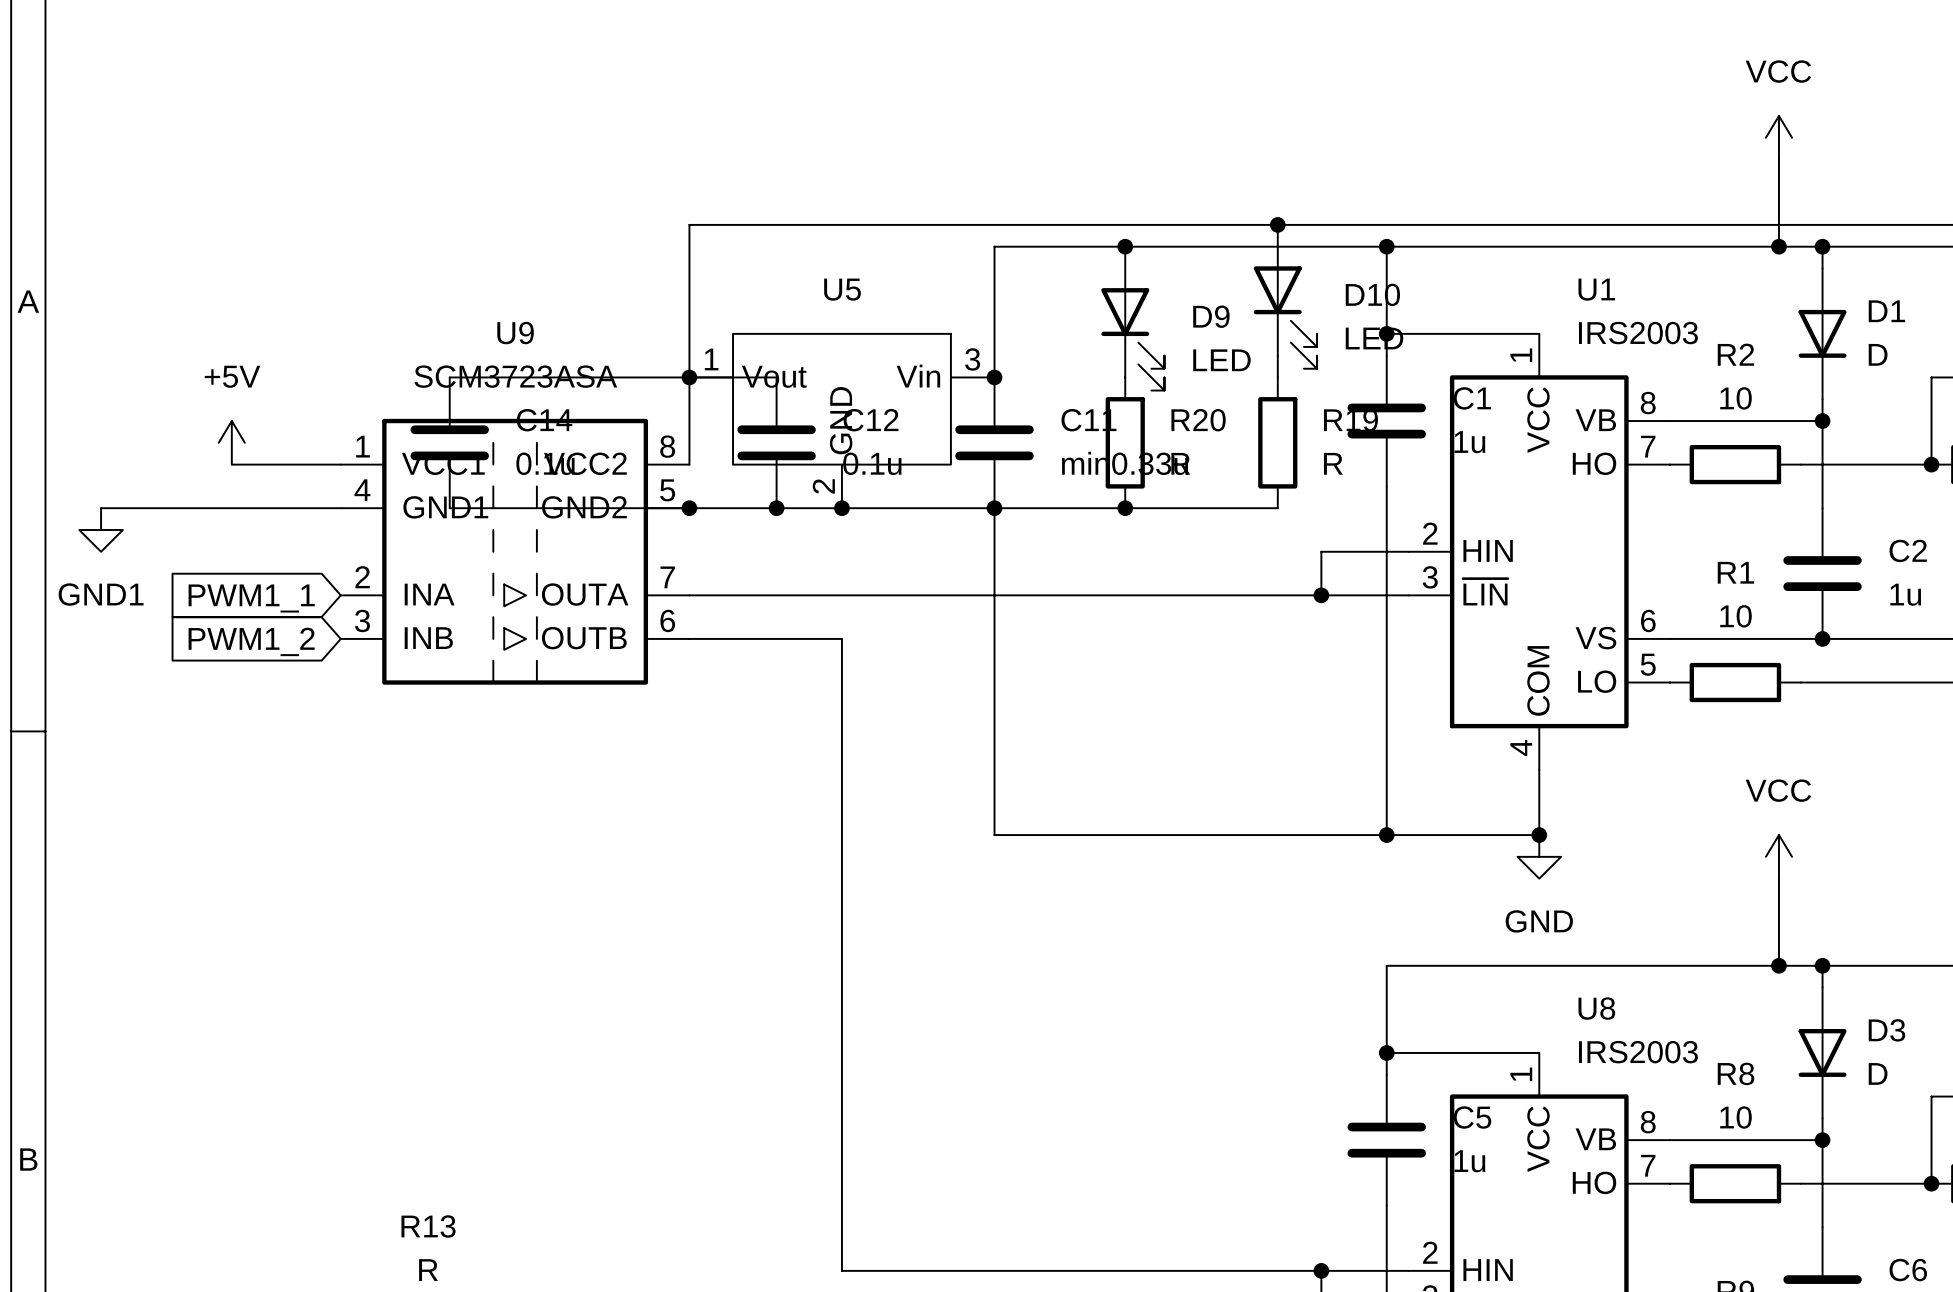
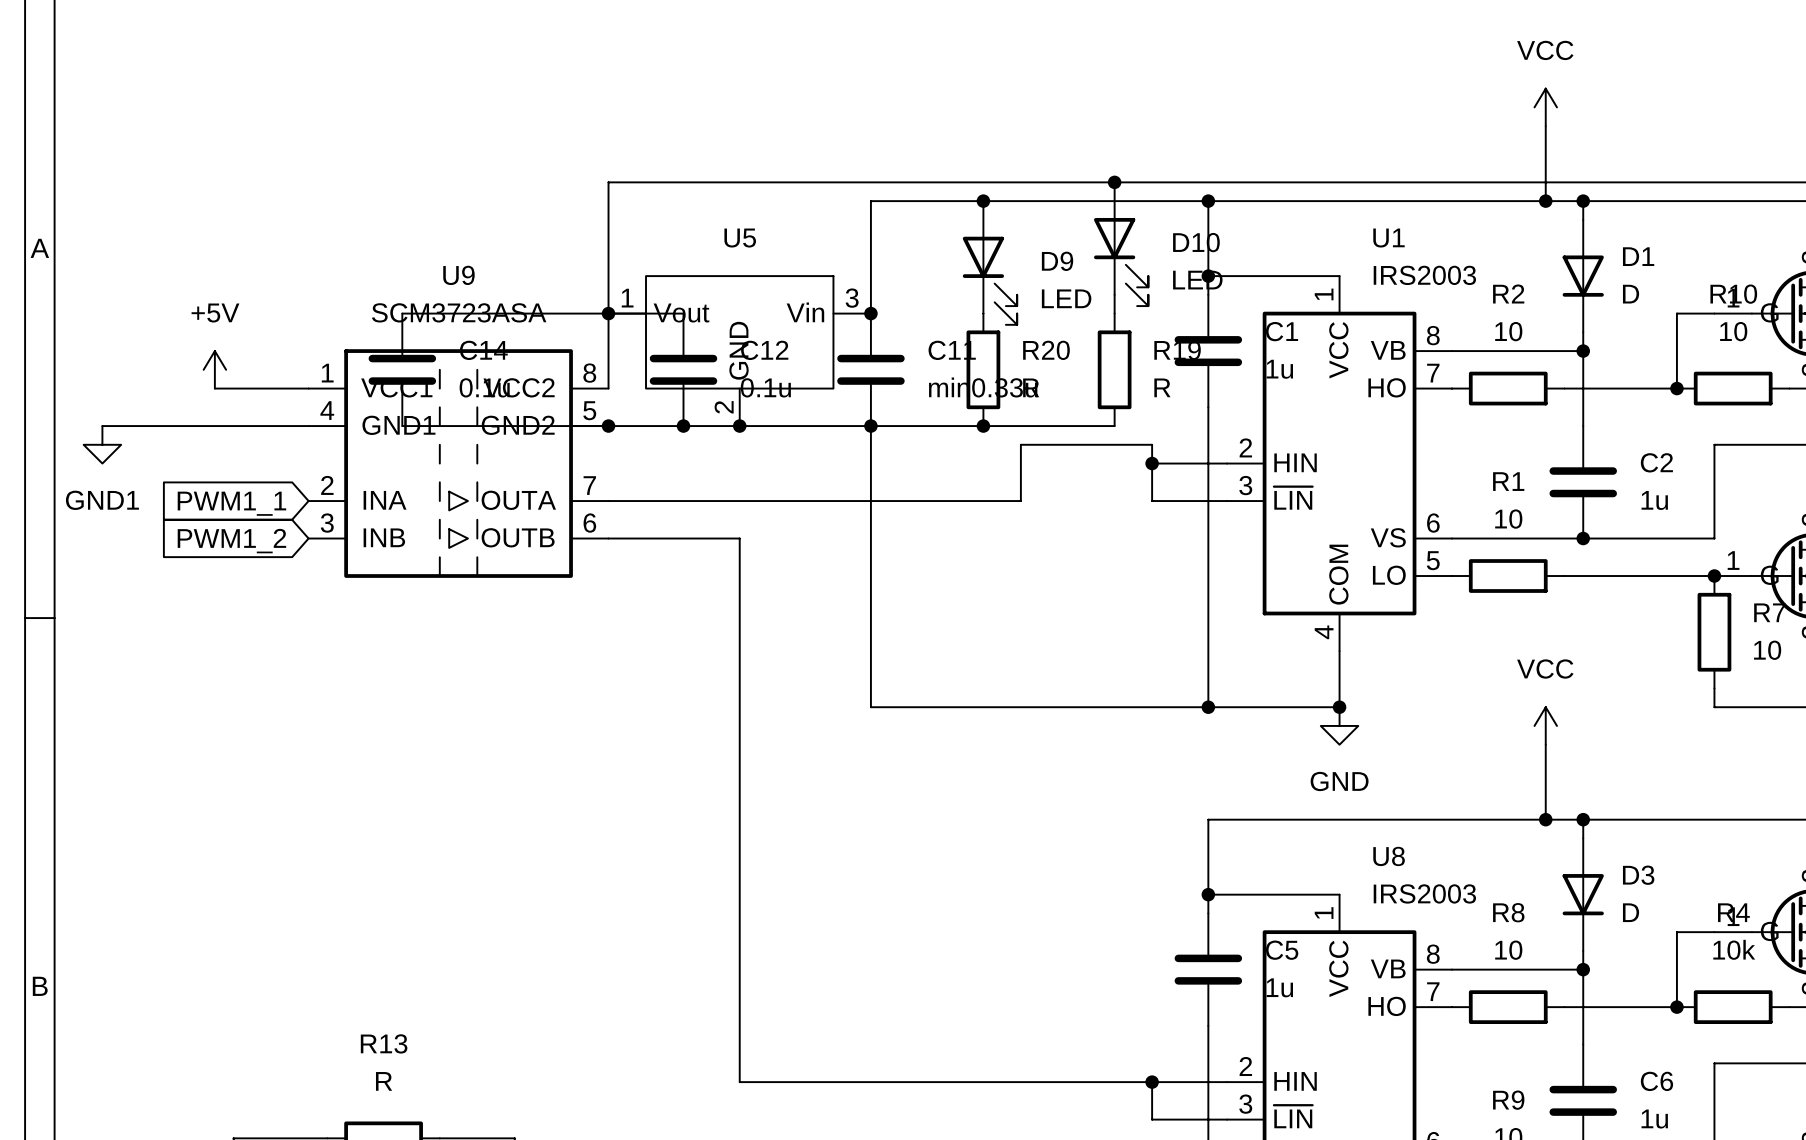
wire: (1168, 595) (1321, 595) -> (1020, 501) (1020, 444) (1152, 444) (1152, 463)
junction position: (1321, 595) -> (1152, 463)

